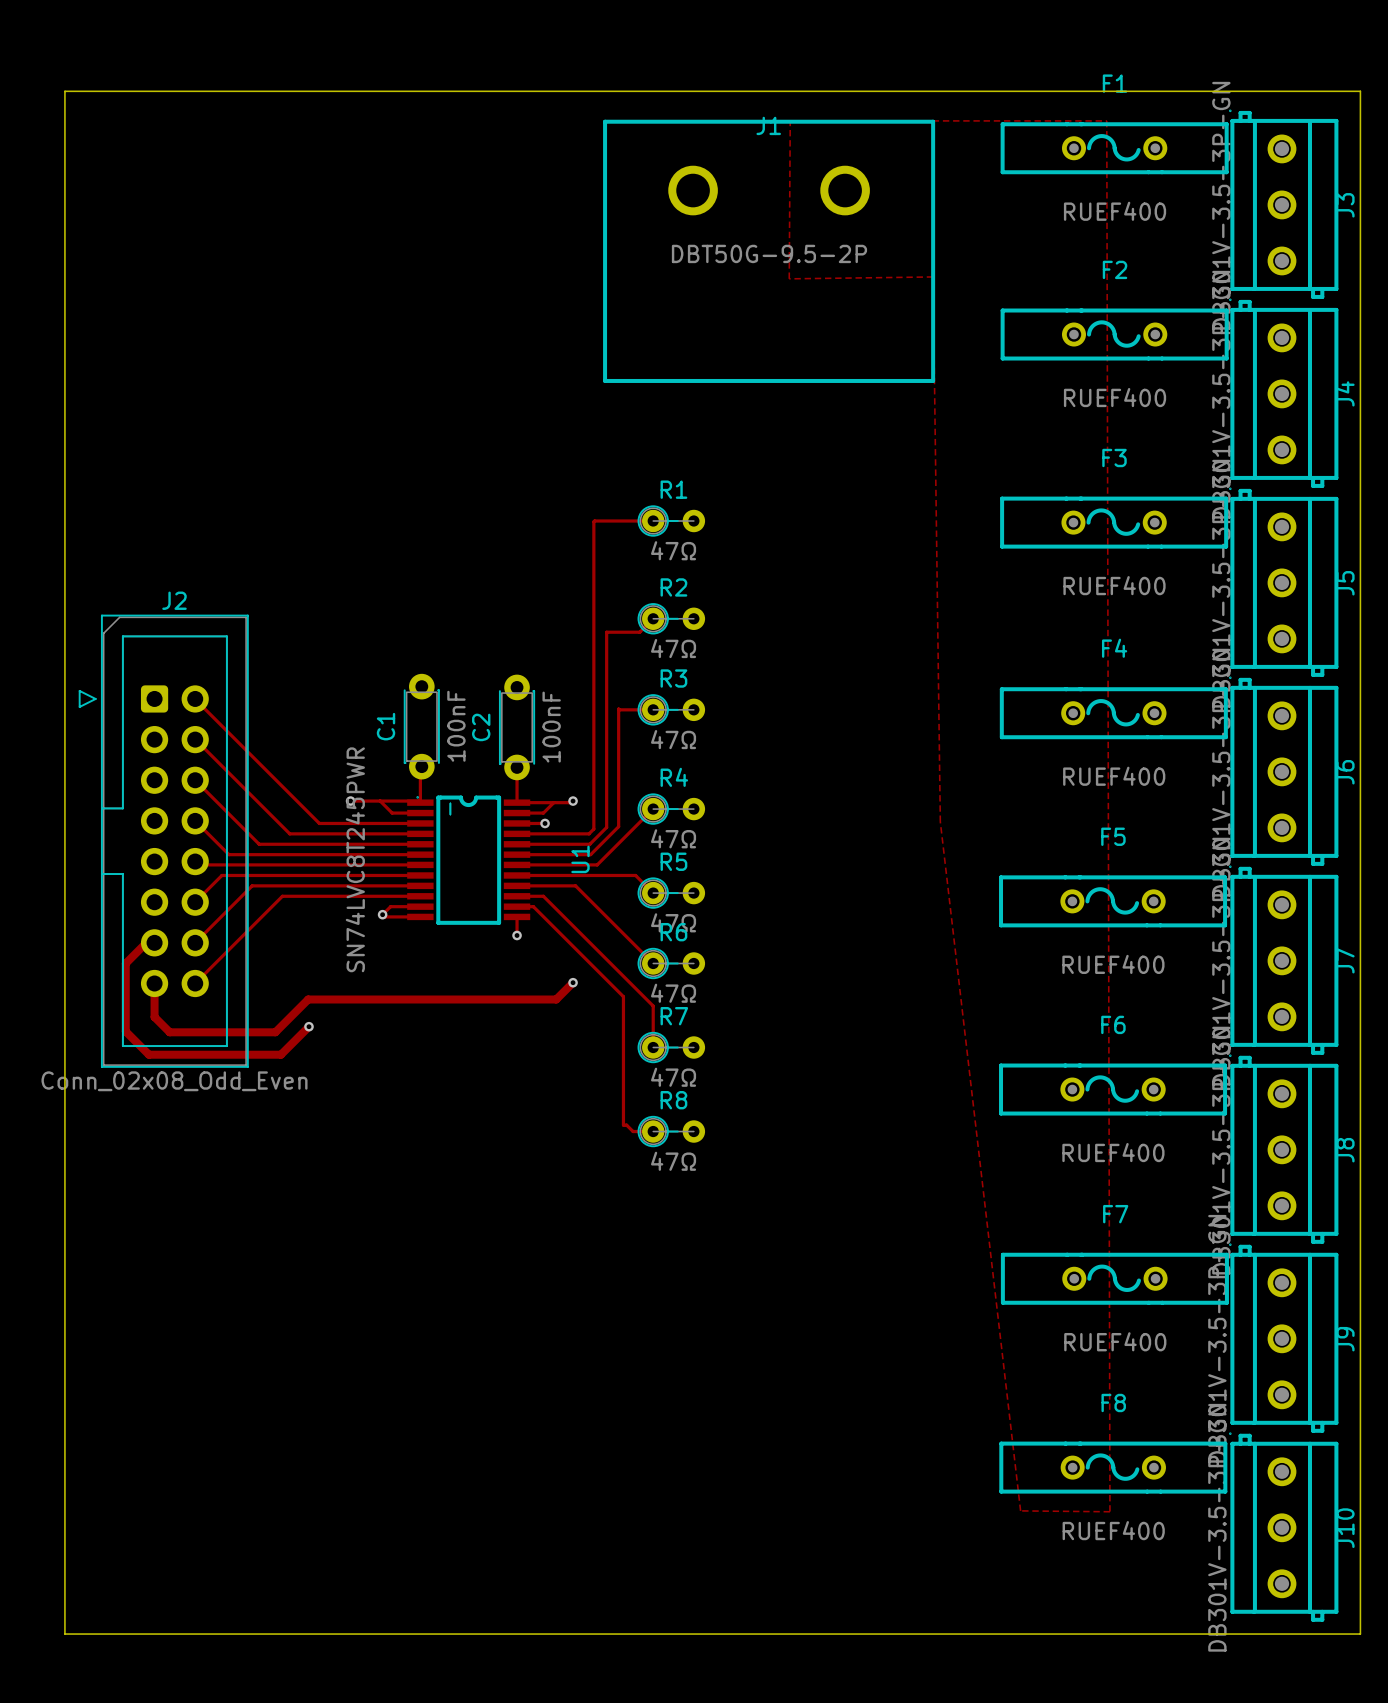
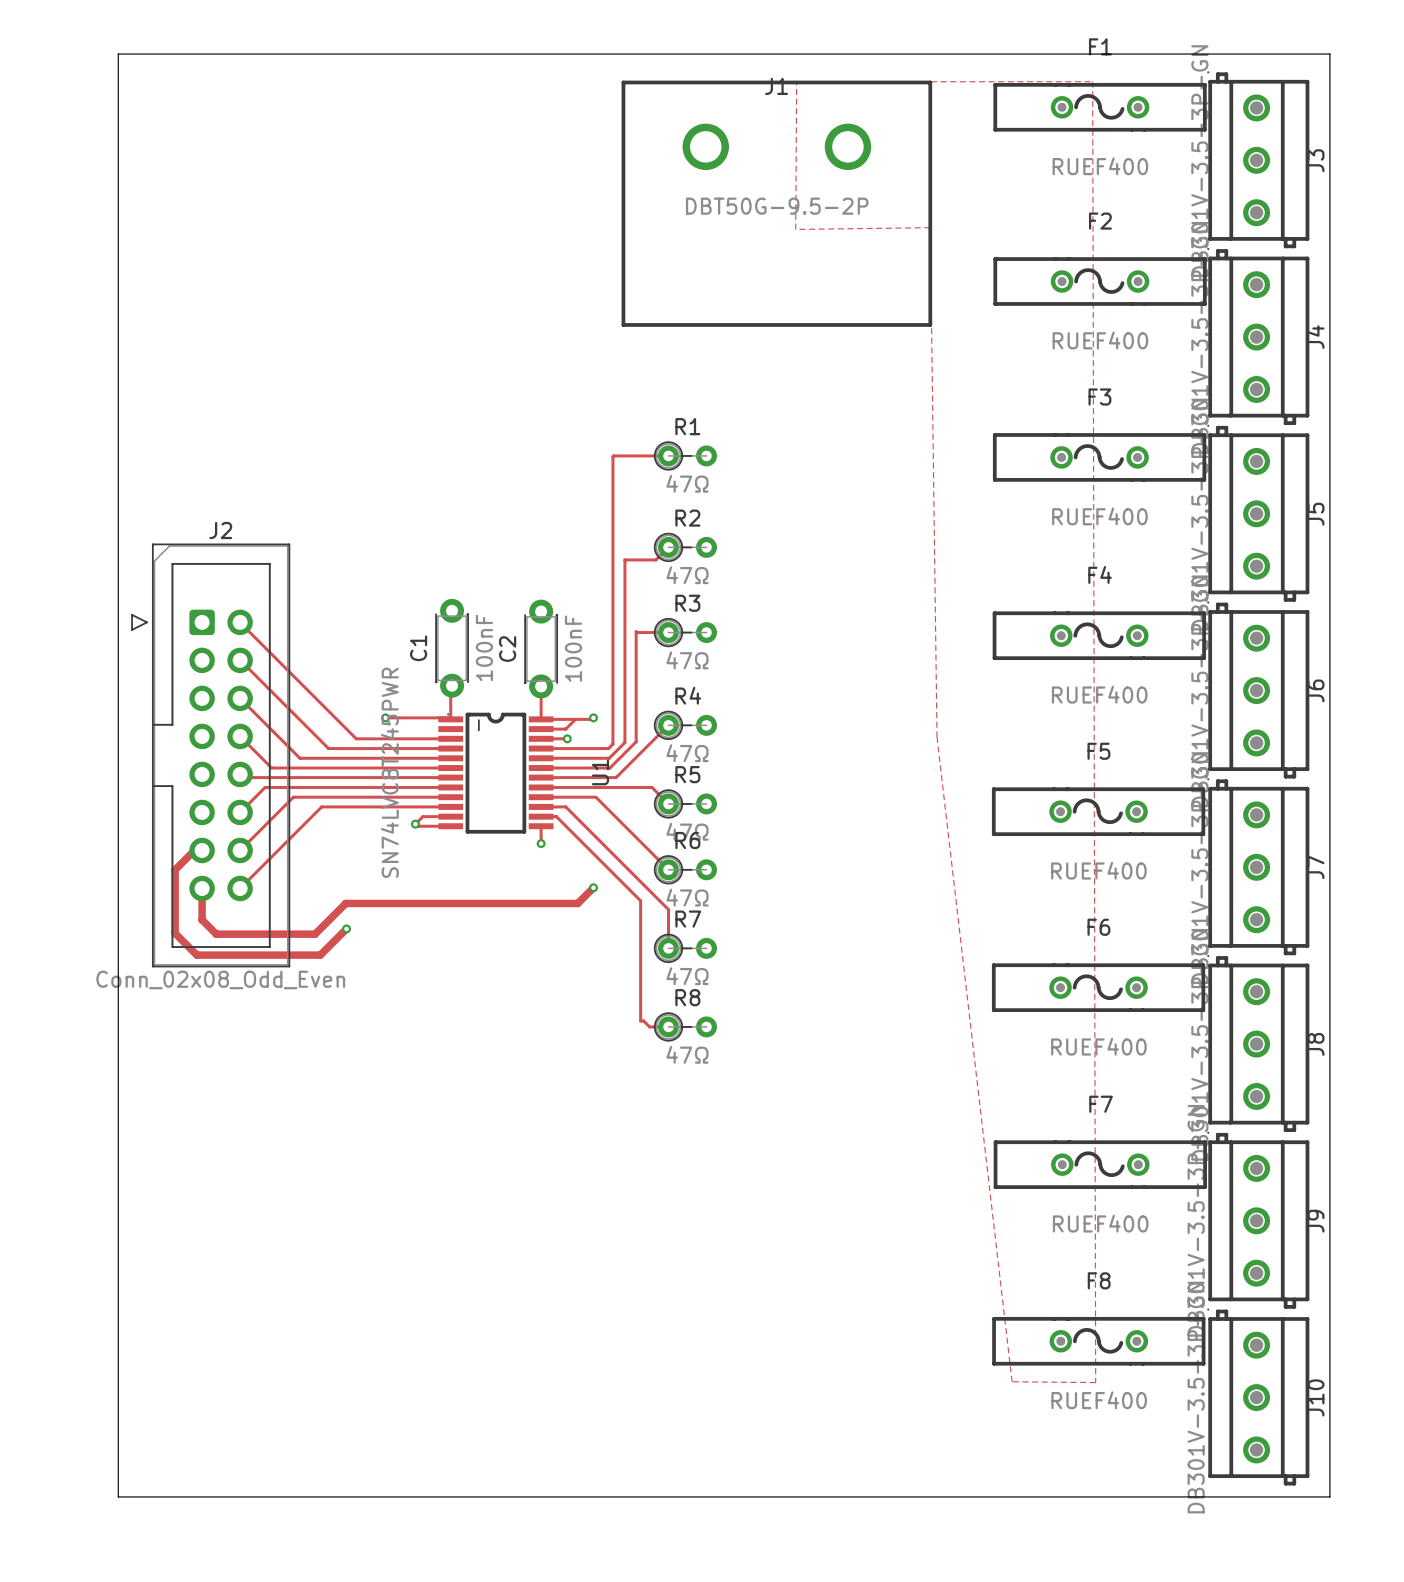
track: (380, 801) (392, 813) (420, 813) -> none

